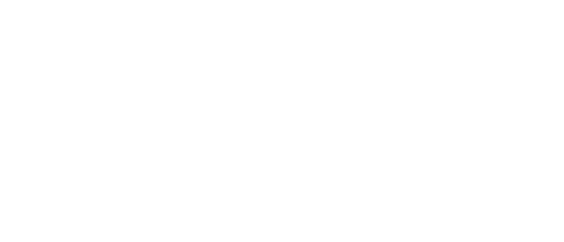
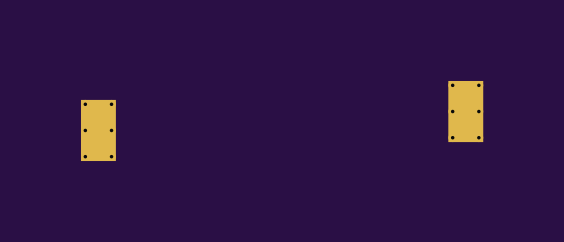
part: none -> (465, 111)
part: none -> (98, 130)

